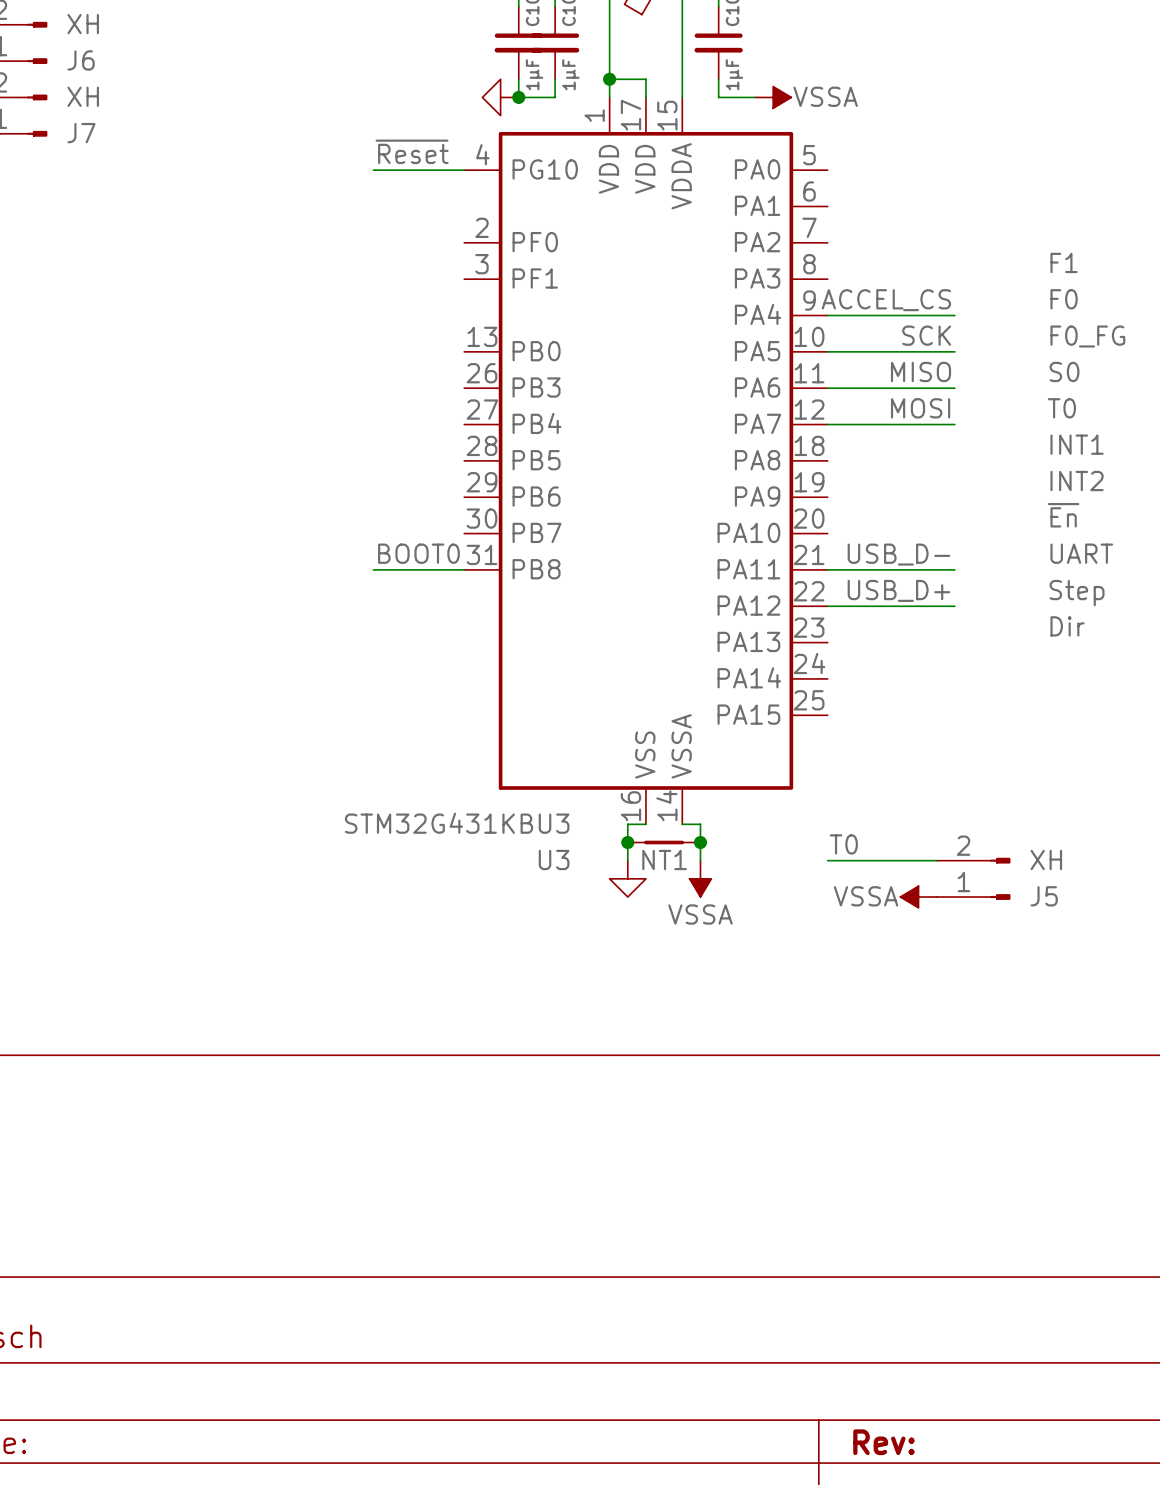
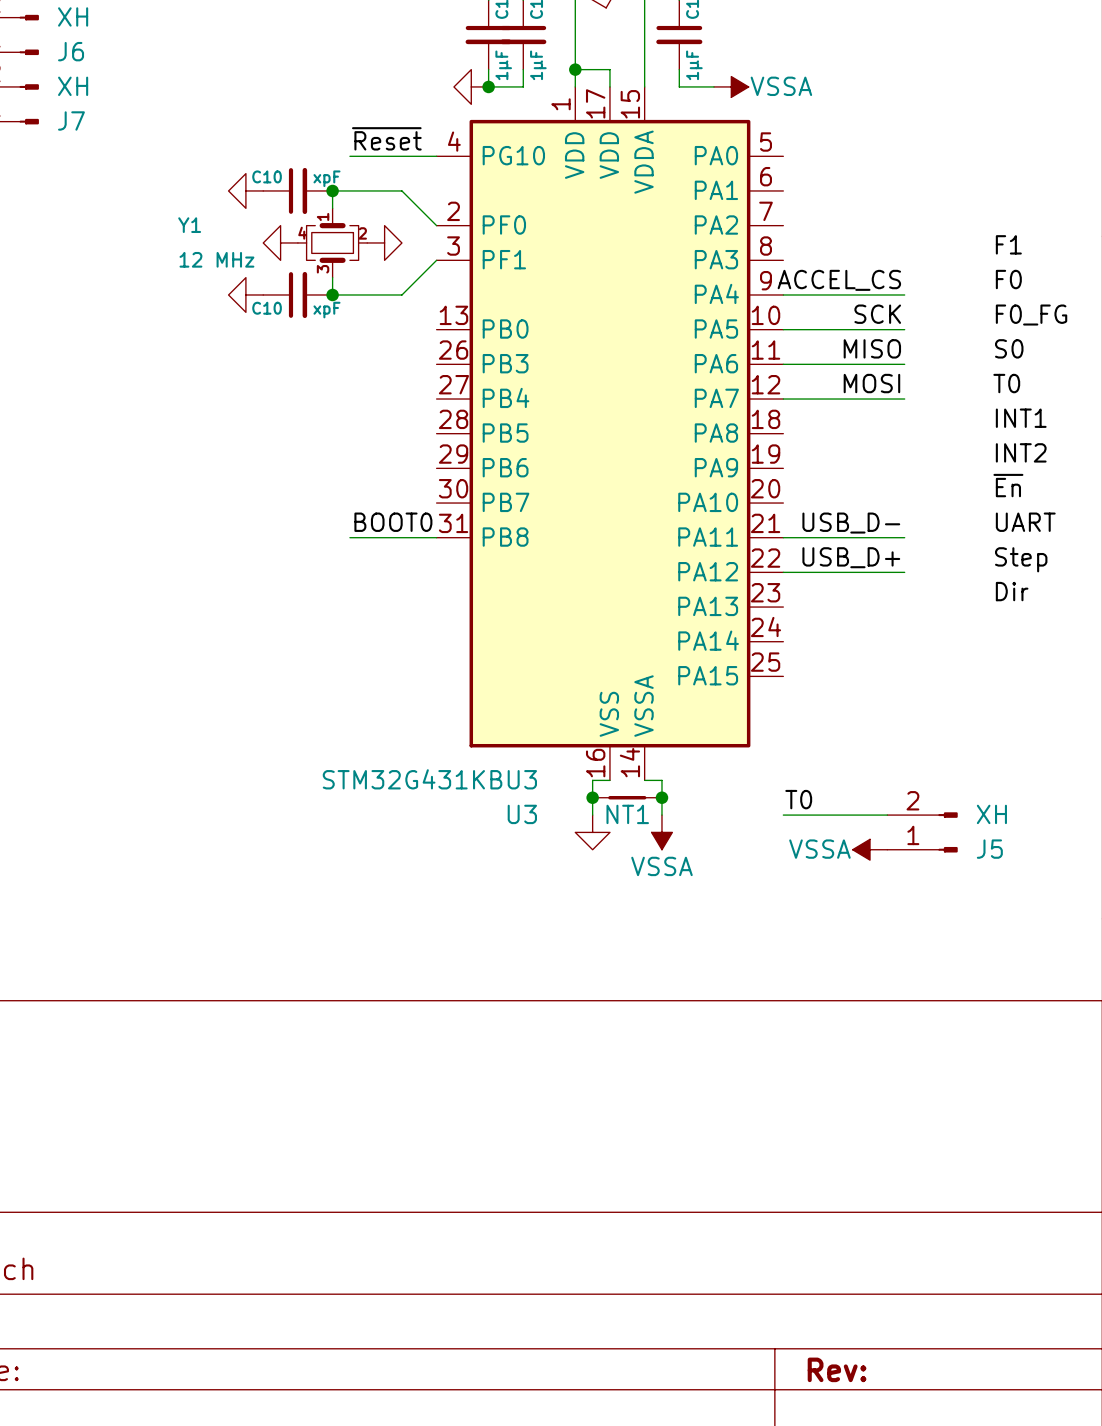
power symbol: none -> (245, 190)
C10: none -> xpF (297, 190)
junction: none -> (332, 190)
wire: none -> (332, 208) (332, 190) (401, 190) (436, 225)
power symbol: none -> (280, 242)
Y1: none -> 12 MHz (332, 242)
power symbol: none -> (384, 242)
wire: none -> (436, 260) (401, 294) (332, 294) (332, 277)
power symbol: none -> (245, 294)
C10: none -> xpF (297, 294)
junction: none -> (332, 294)

